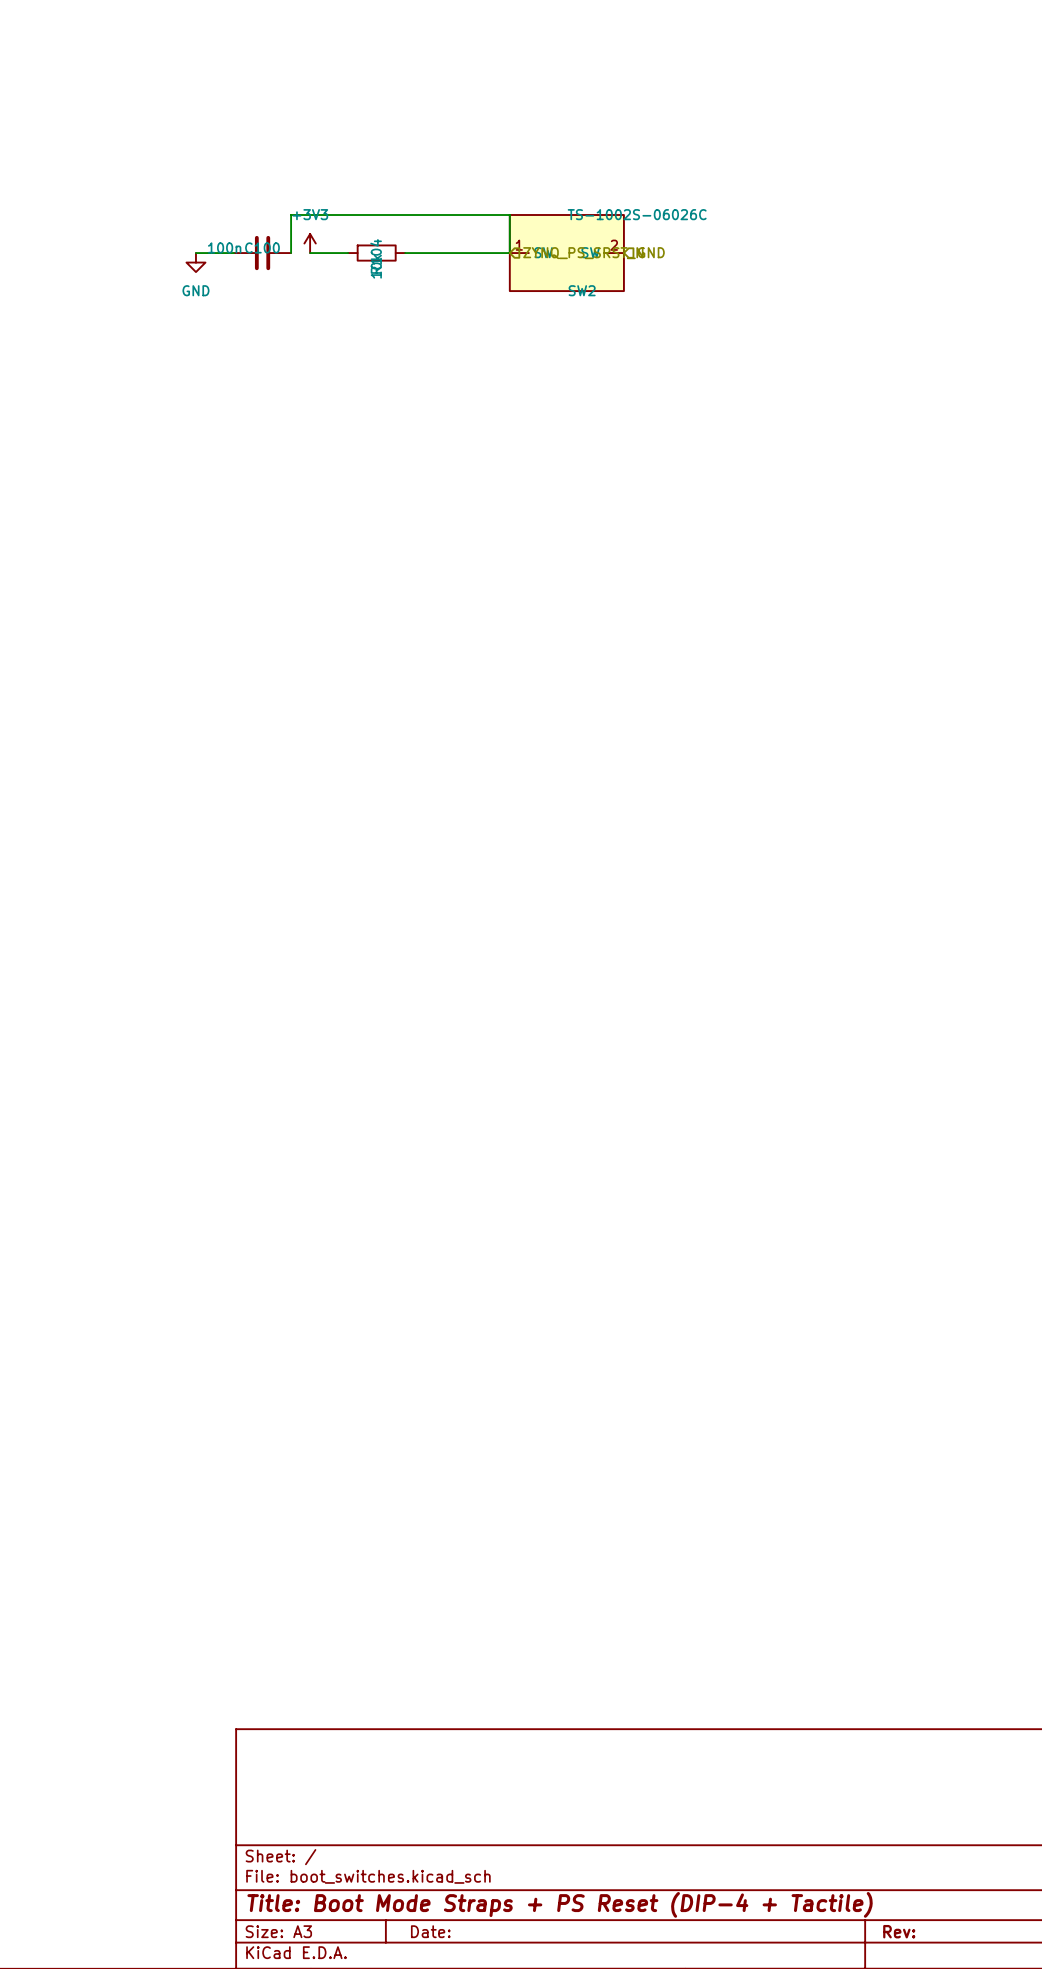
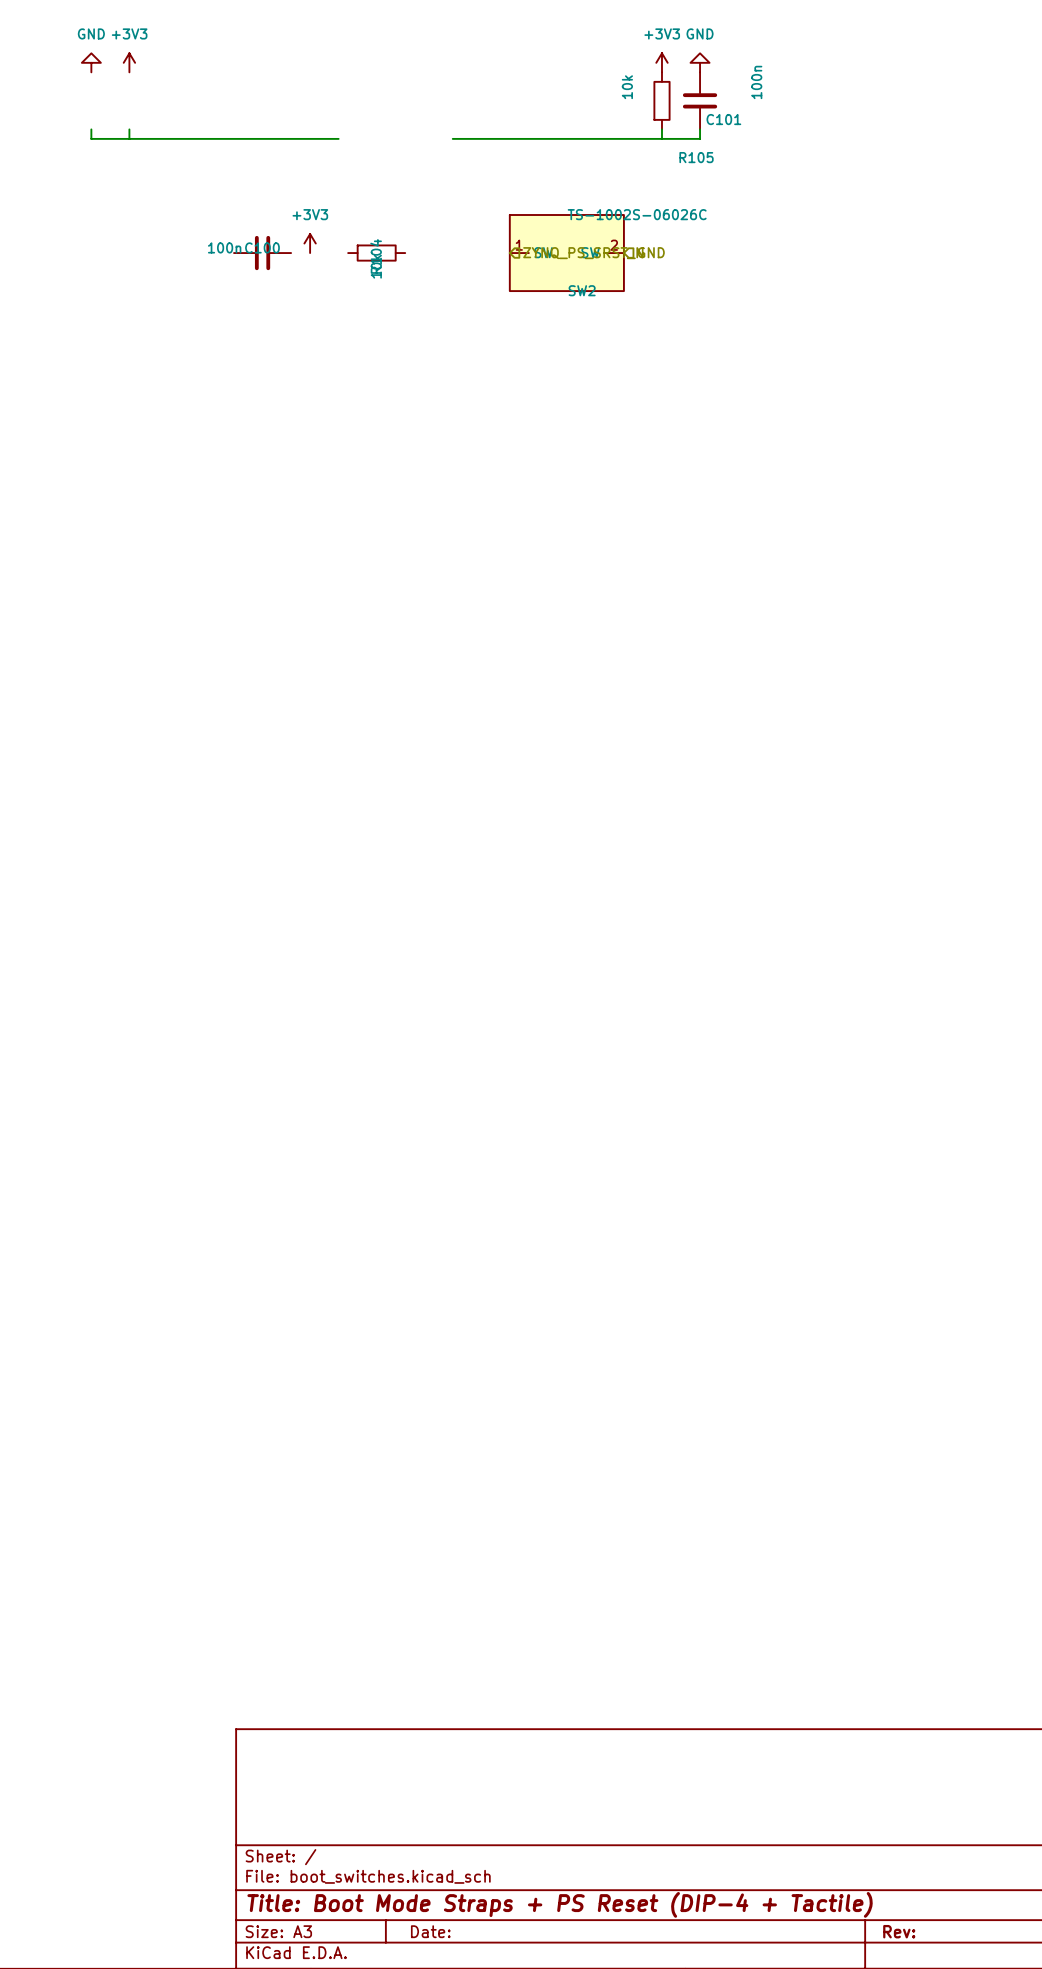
power symbol: none -> GND (91, 62)
power symbol: none -> +3V3 (129, 62)
power symbol: none -> +3V3 (661, 62)
power symbol: none -> GND (700, 62)
R105: none -> 10k (661, 100)
C101: none -> 100n (700, 100)
wire: none -> (91, 129) (91, 138) (338, 138)
wire: none -> (129, 129) (129, 138)
wire: none -> (661, 129) (661, 138)
wire: none -> (700, 129) (700, 138) (452, 138)
wire: (195, 253) (234, 253) -> none
wire: (291, 253) (291, 215) (509, 215) (509, 253) (405, 253) -> none
wire: (310, 253) (348, 253) -> none
power symbol: GND (195, 262) -> none

